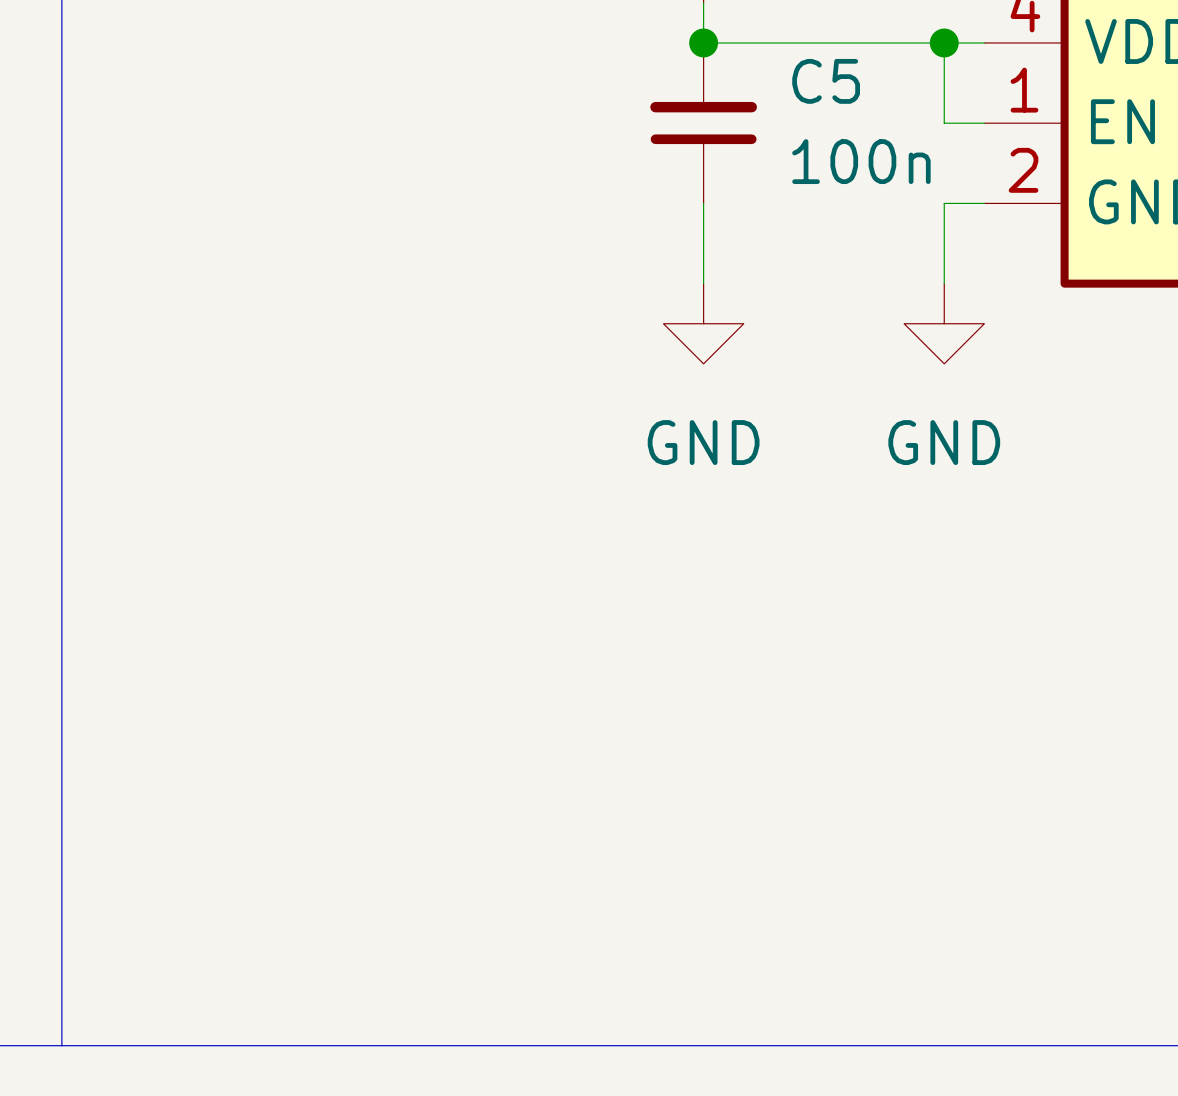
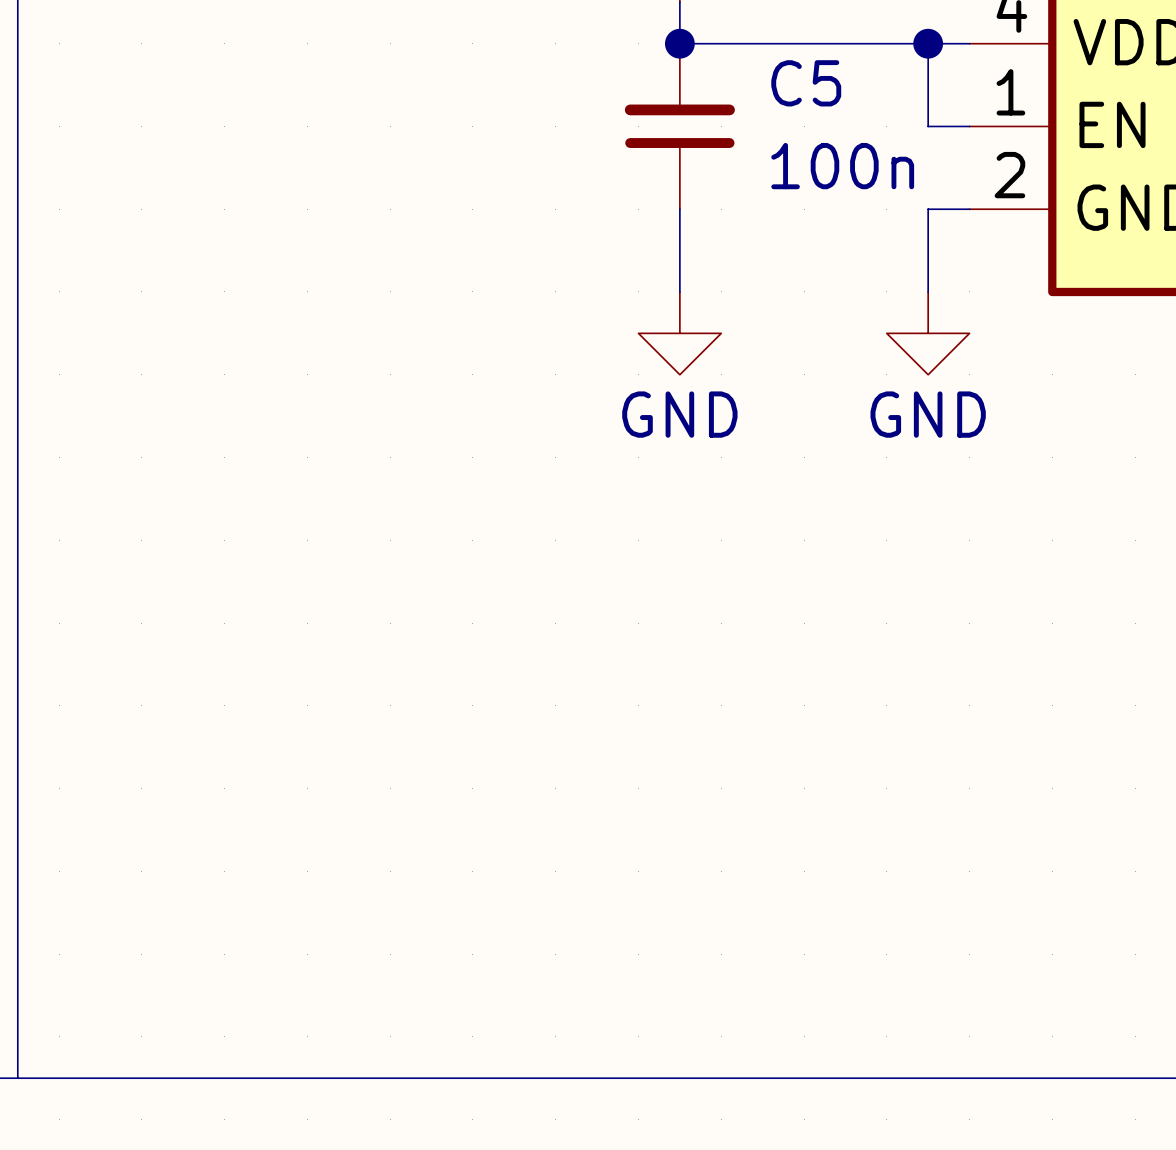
power symbol text position: GND (703, 442) -> GND (679, 414)
power symbol text position: GND (944, 442) -> GND (928, 414)

